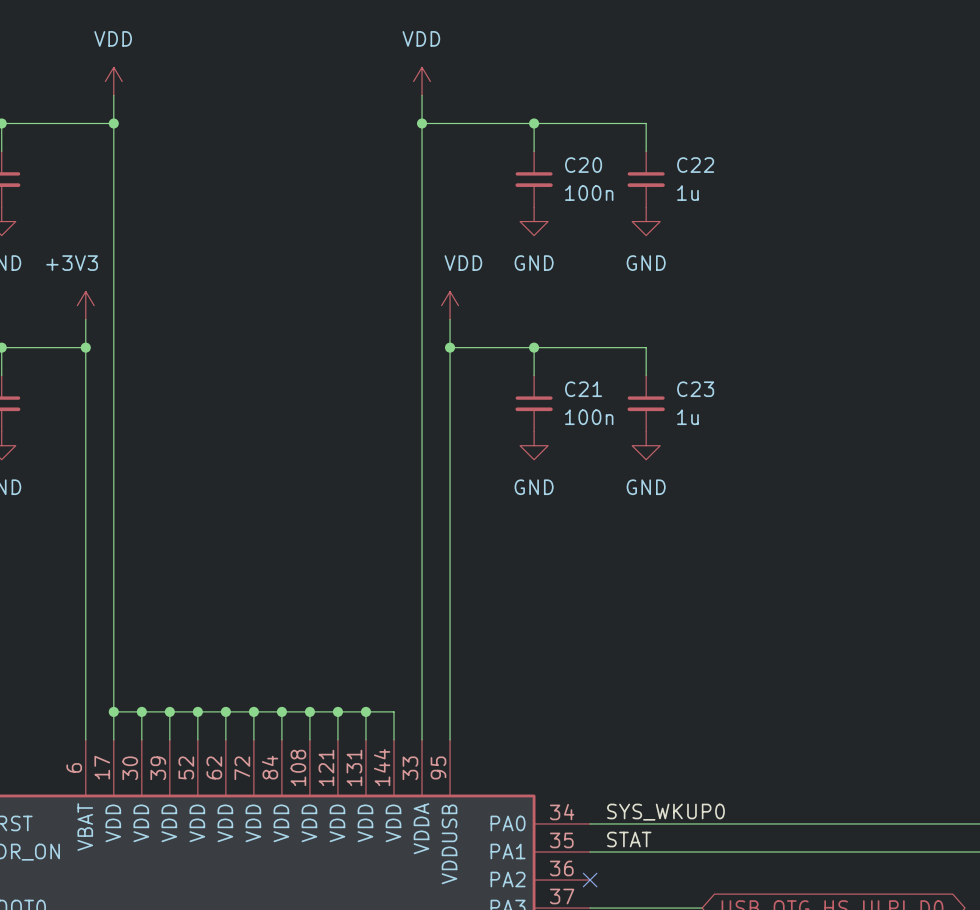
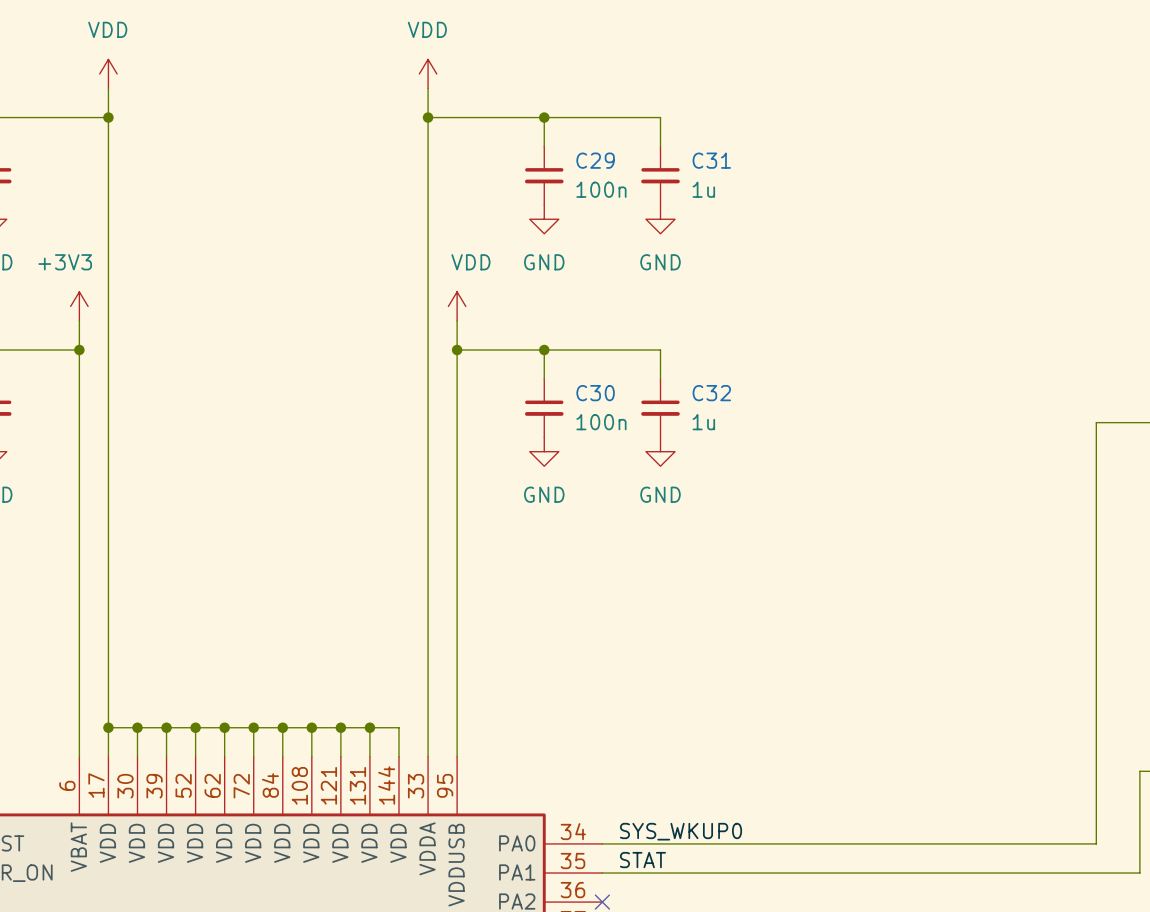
C20 name: C20 (583, 165) -> C29 (595, 160)
C22 name: C22 (695, 165) -> C31 (711, 160)
C21 name: C21 (583, 389) -> C30 (595, 393)
C23 name: C23 (695, 389) -> C32 (711, 393)

